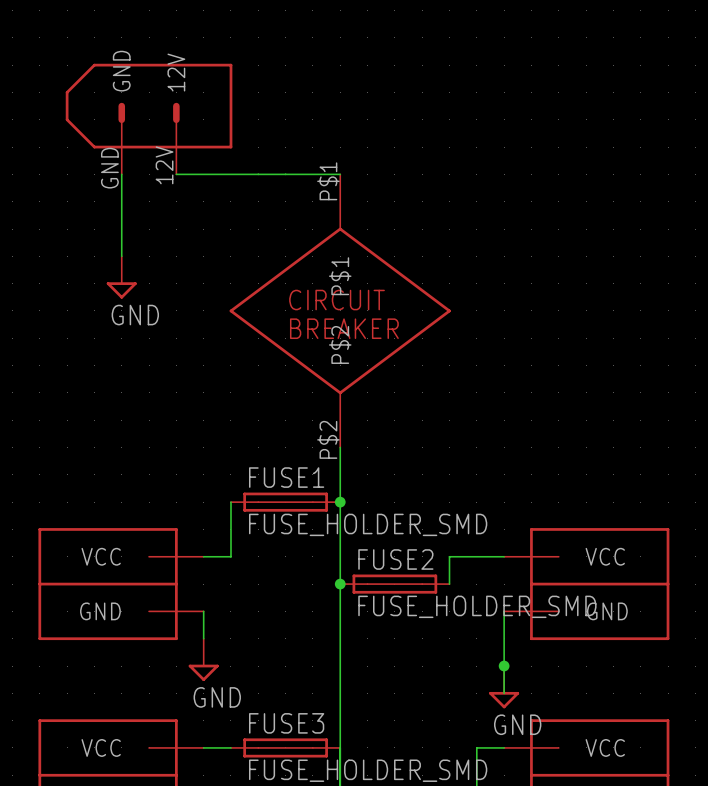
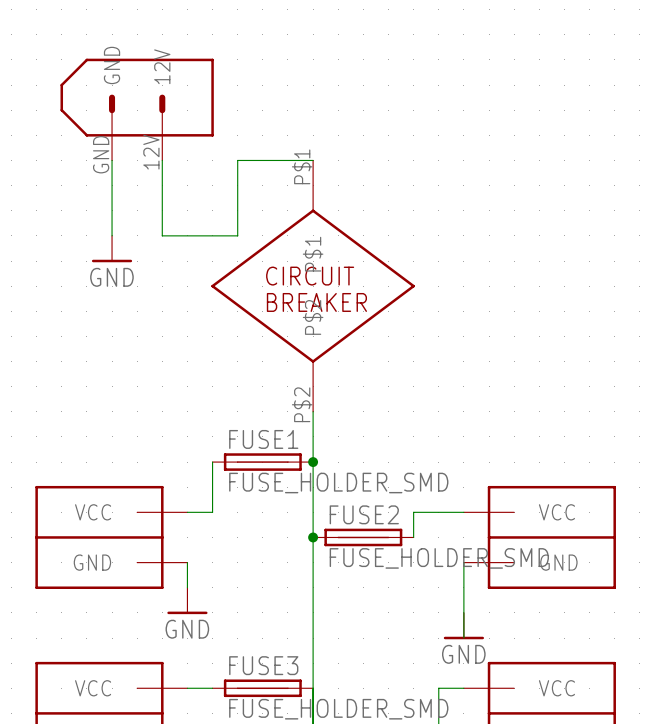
wire: (176, 174) (258, 174) -> (162, 160) (162, 235) (237, 235) (237, 160)
power symbol shape: [106, 256, 137, 299] -> [91, 235, 133, 263]
power symbol shape: [188, 638, 219, 682] -> [167, 587, 208, 615]
power symbol shape: [489, 666, 520, 709] -> [443, 612, 485, 640]
junction: (504, 666) -> none

